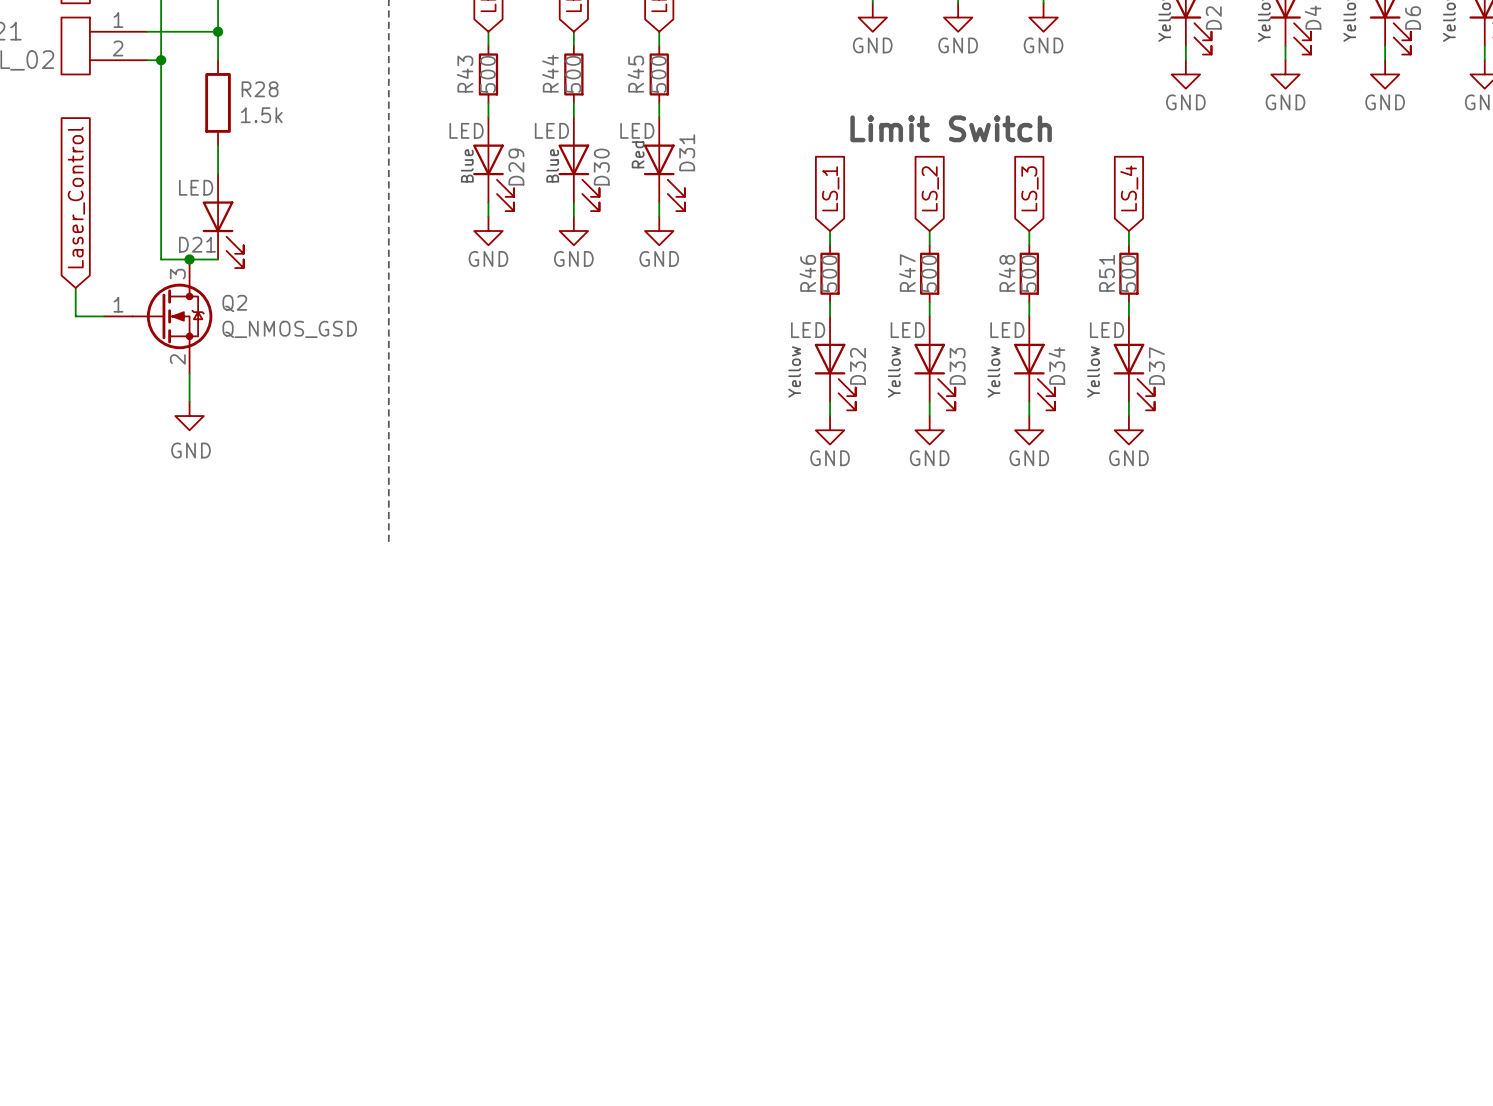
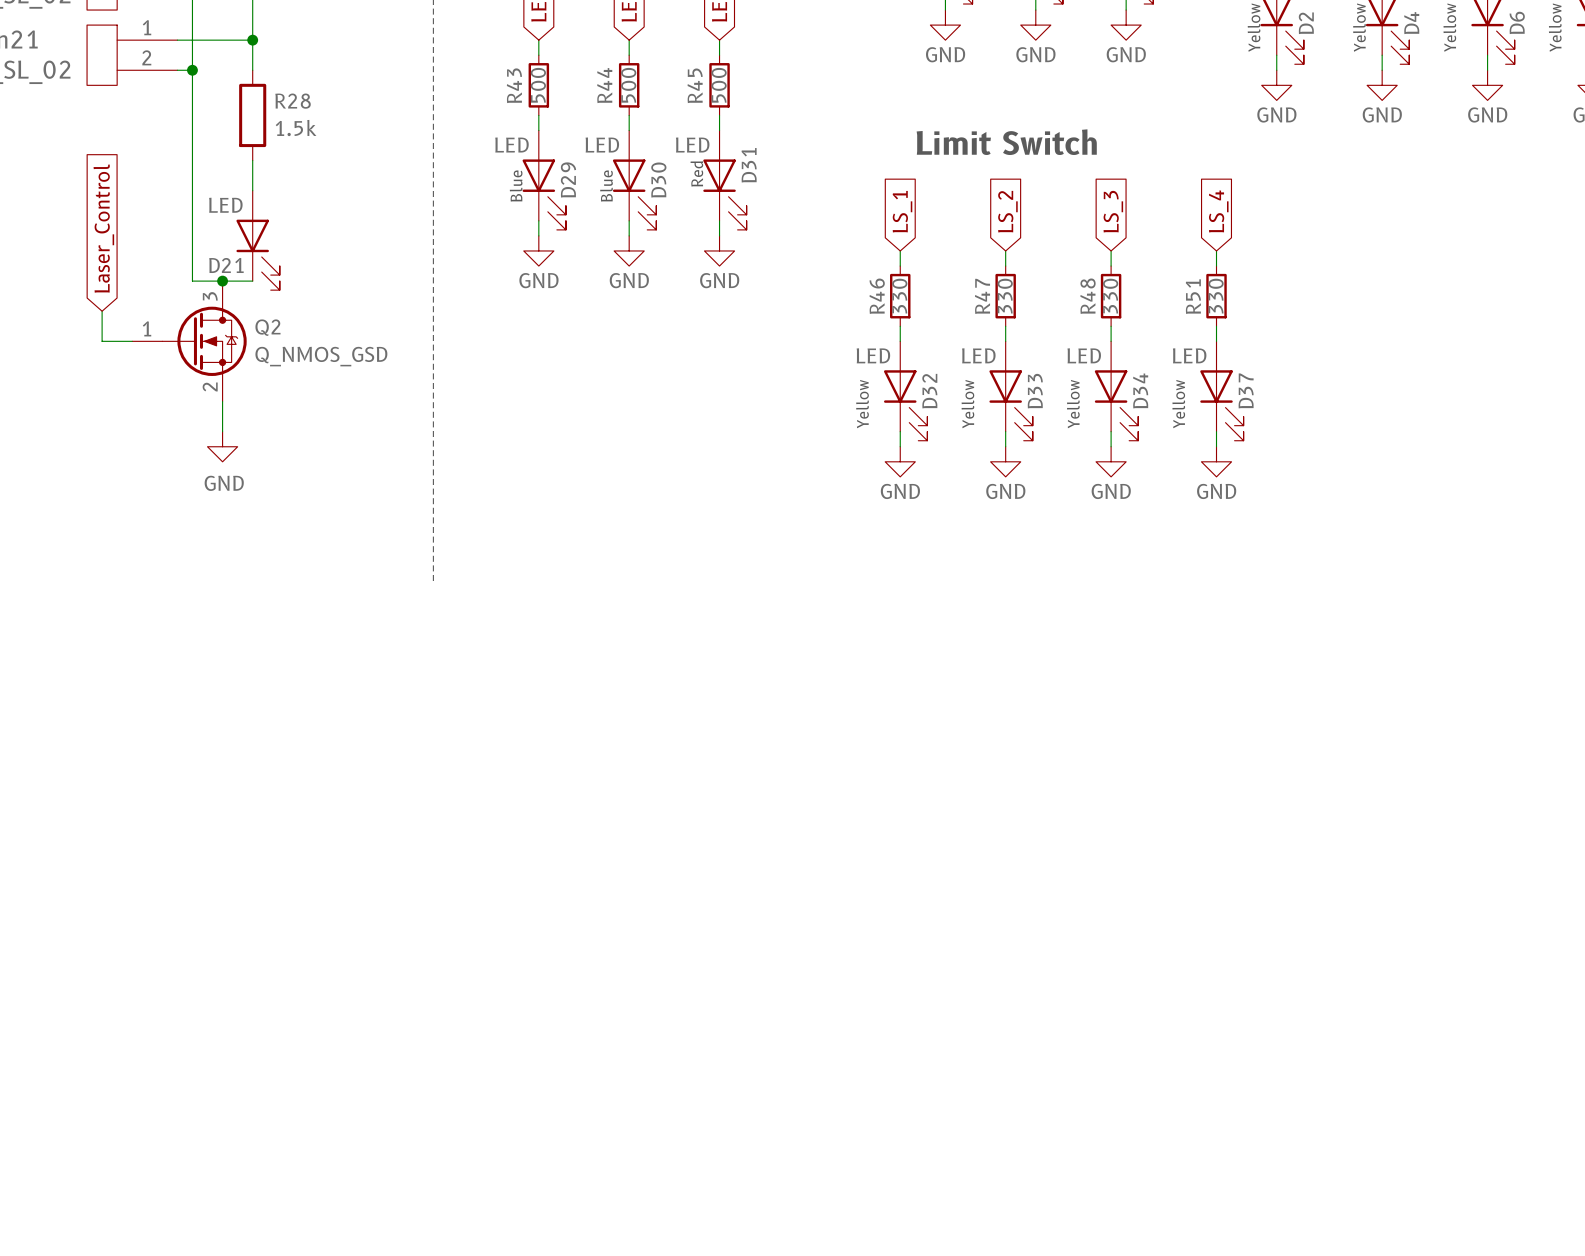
R46 value: 500 (829, 273) -> 330 (899, 296)
R47 value: 500 (929, 273) -> 330 (1005, 296)
R48 value: 500 (1028, 273) -> 330 (1110, 296)
R51 value: 500 (1128, 273) -> 330 (1216, 296)

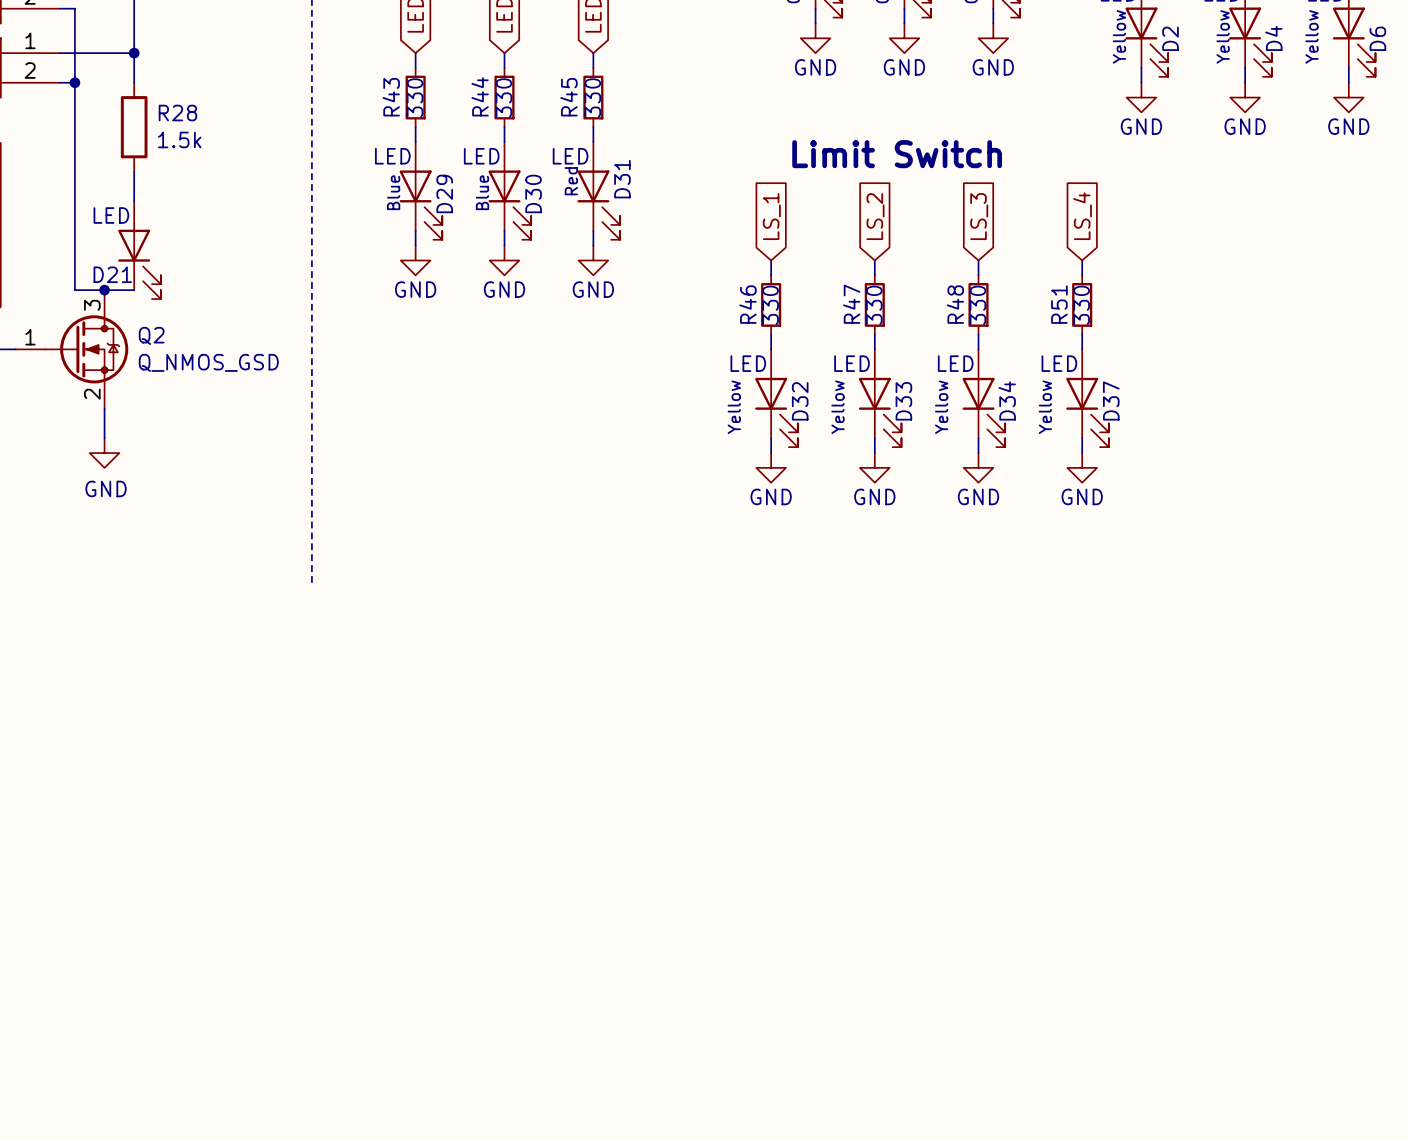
R43 value: 500 (538, 85) -> 330 (415, 97)
R44 value: 500 (628, 85) -> 330 (503, 97)
R45 value: 500 (719, 85) -> 330 (592, 97)

